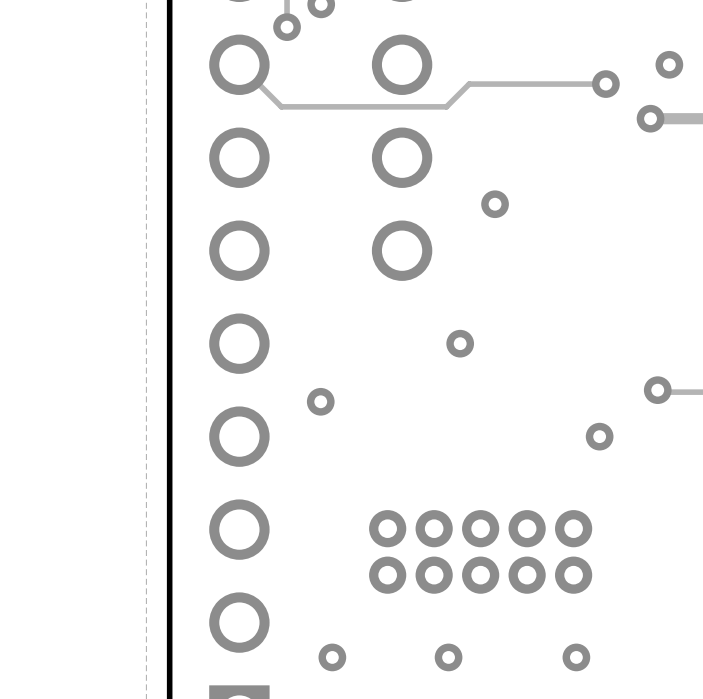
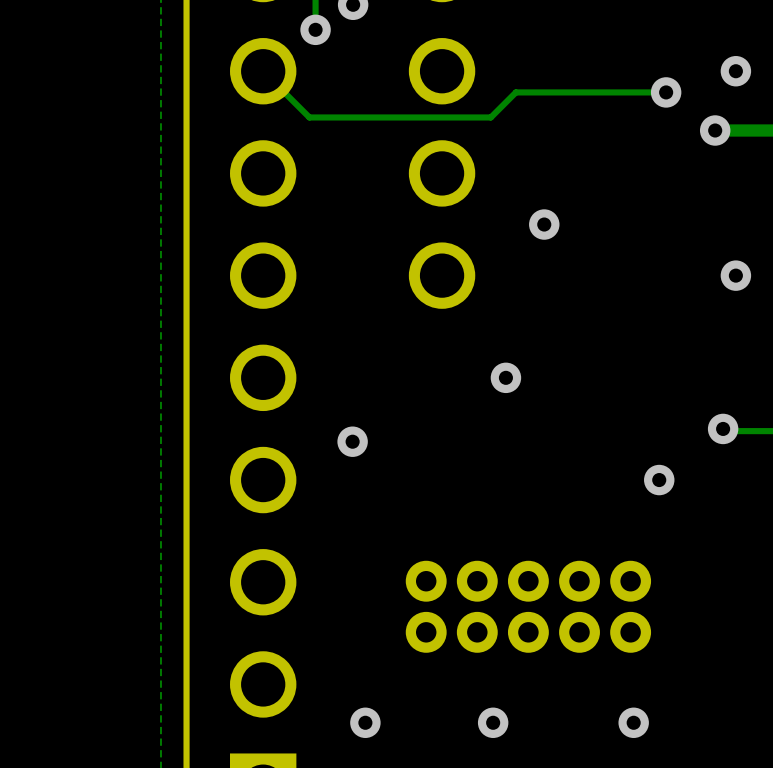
via: none -> (735, 275)

